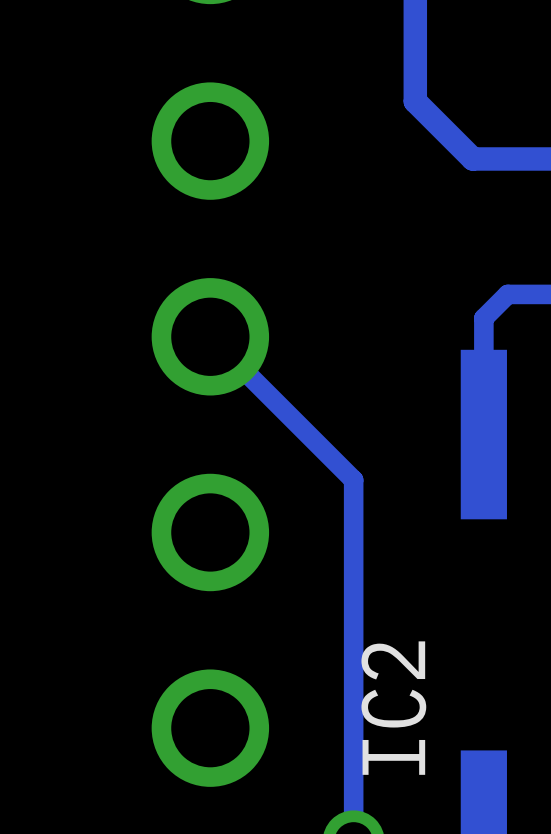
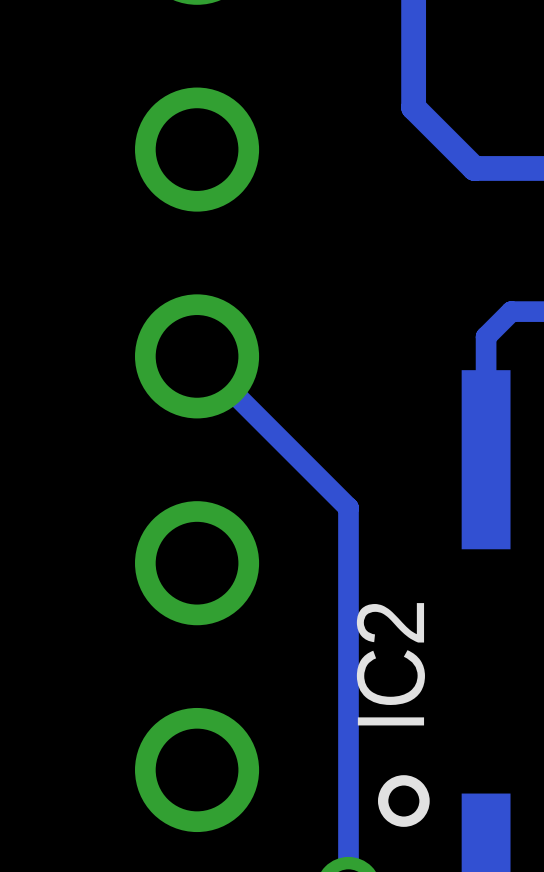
IC2 name position: IC2 (393, 708) -> IC2 (390, 664)
drawing: none -> [378, 775, 430, 827]

